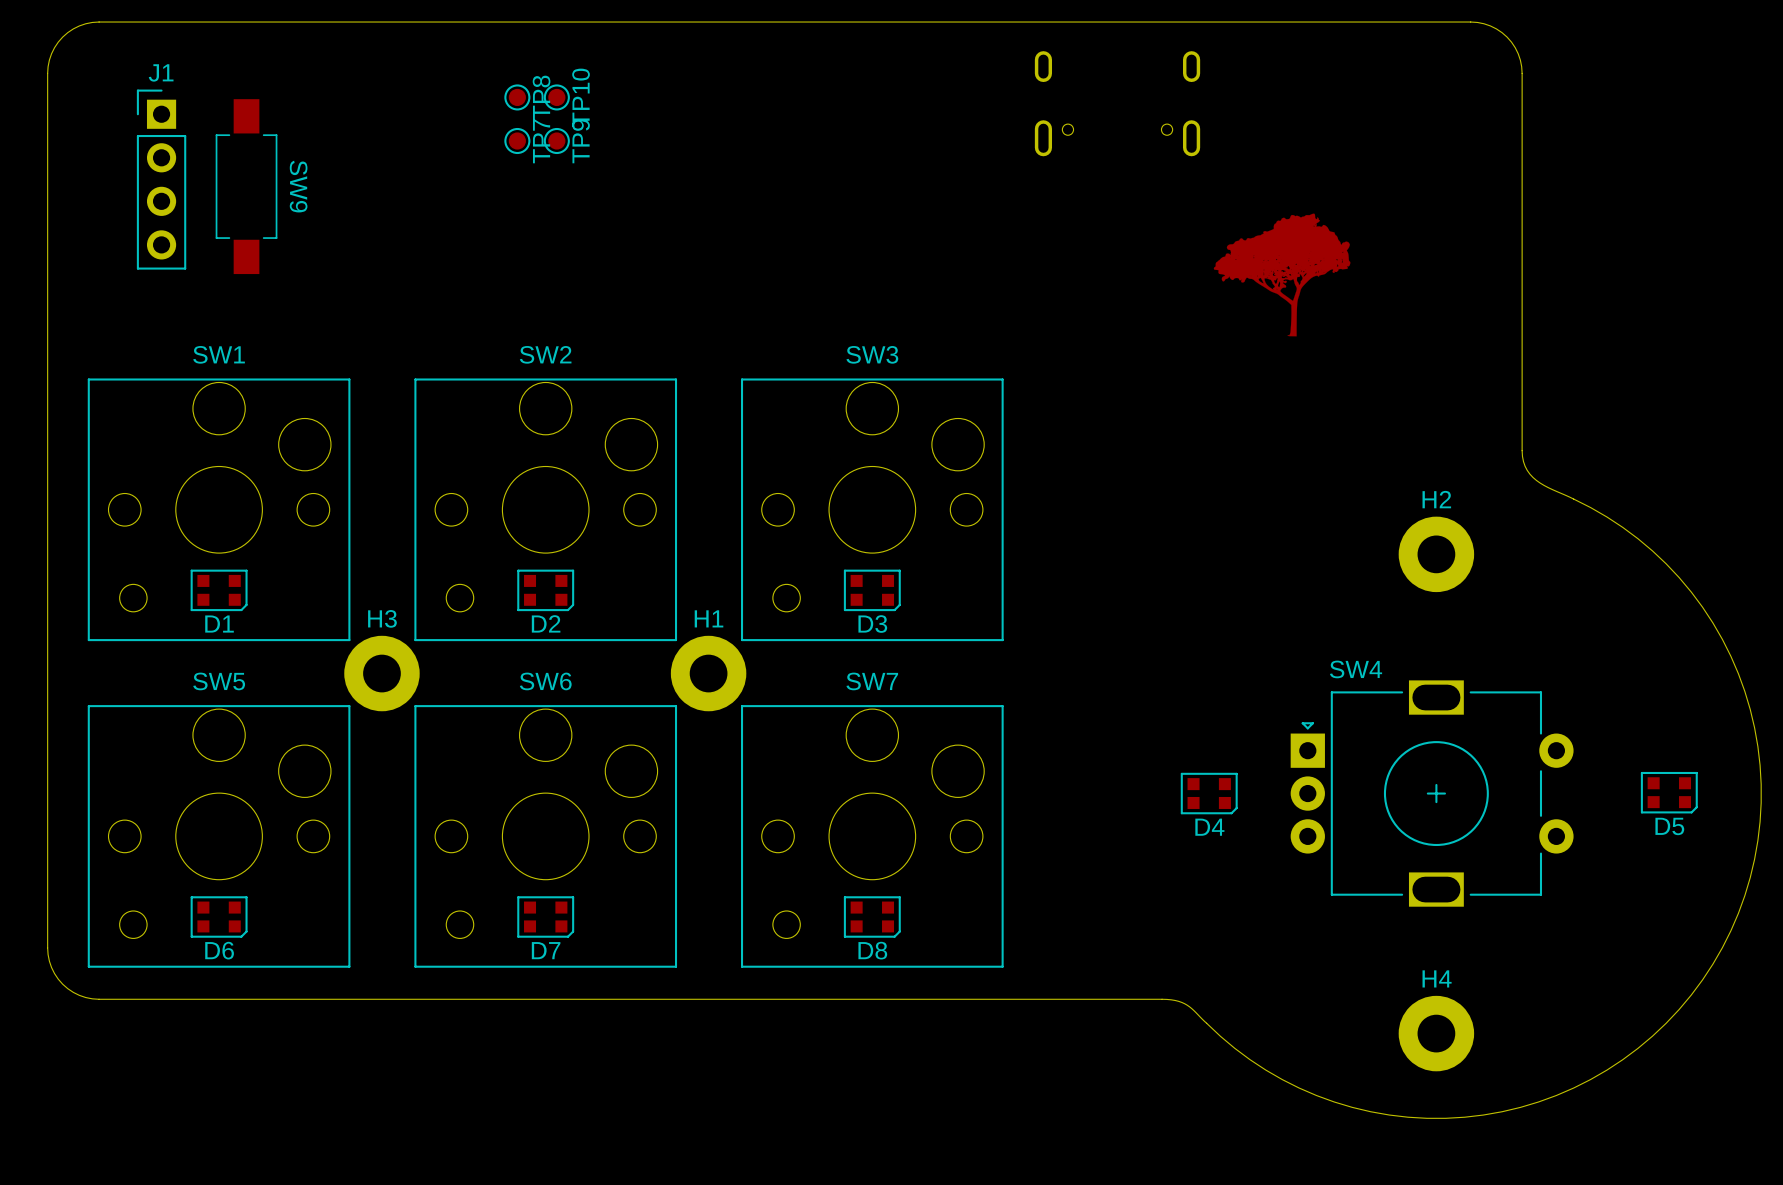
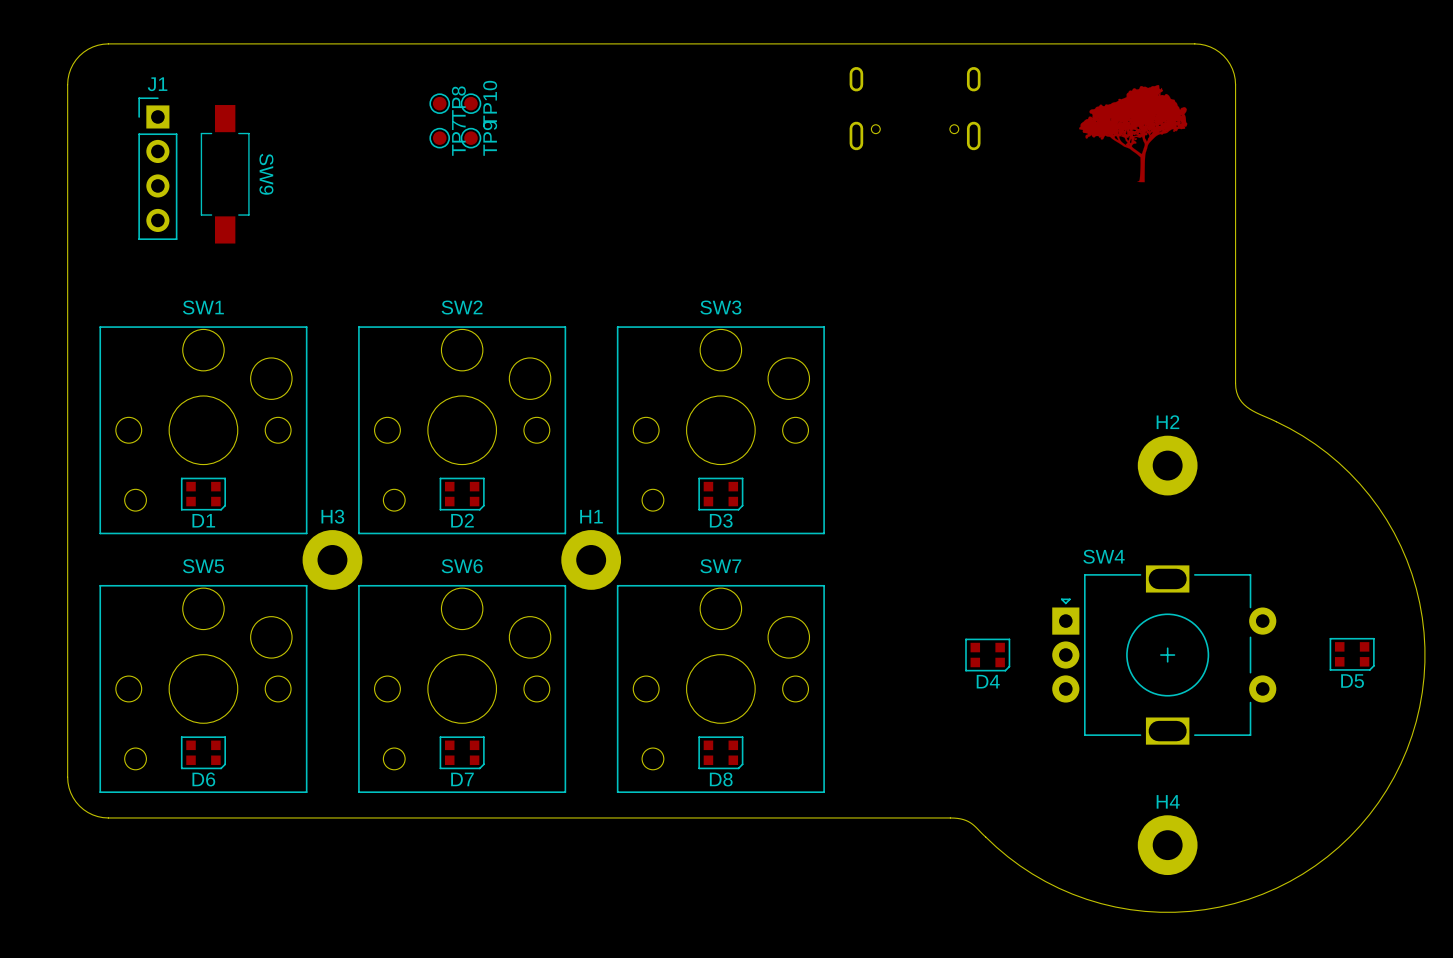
part position: (1282, 274) -> (1133, 133)

